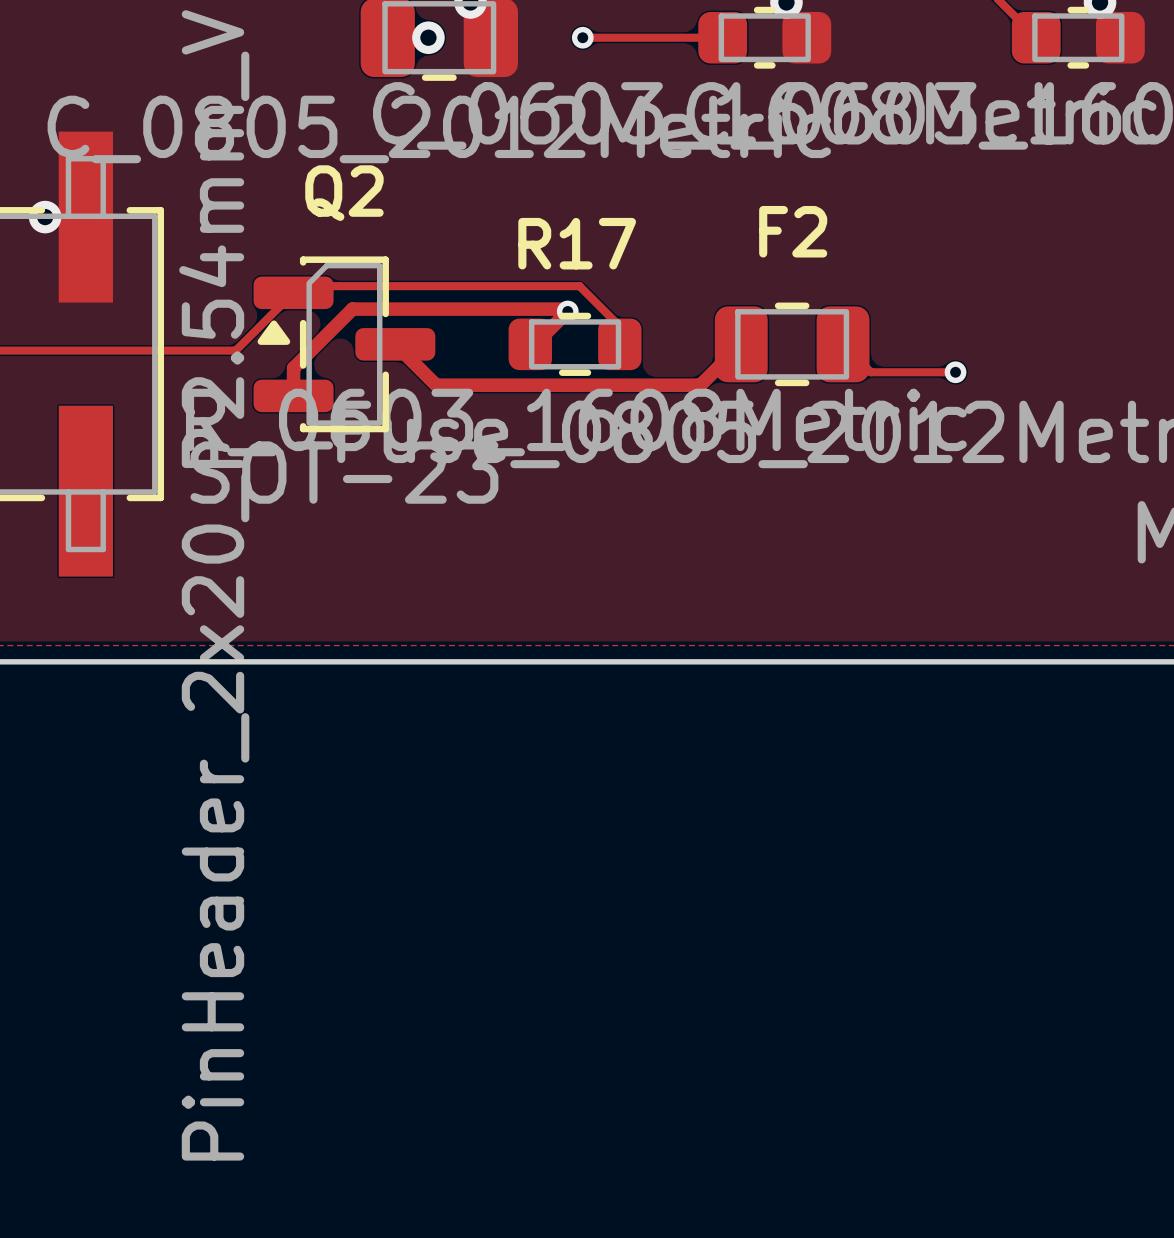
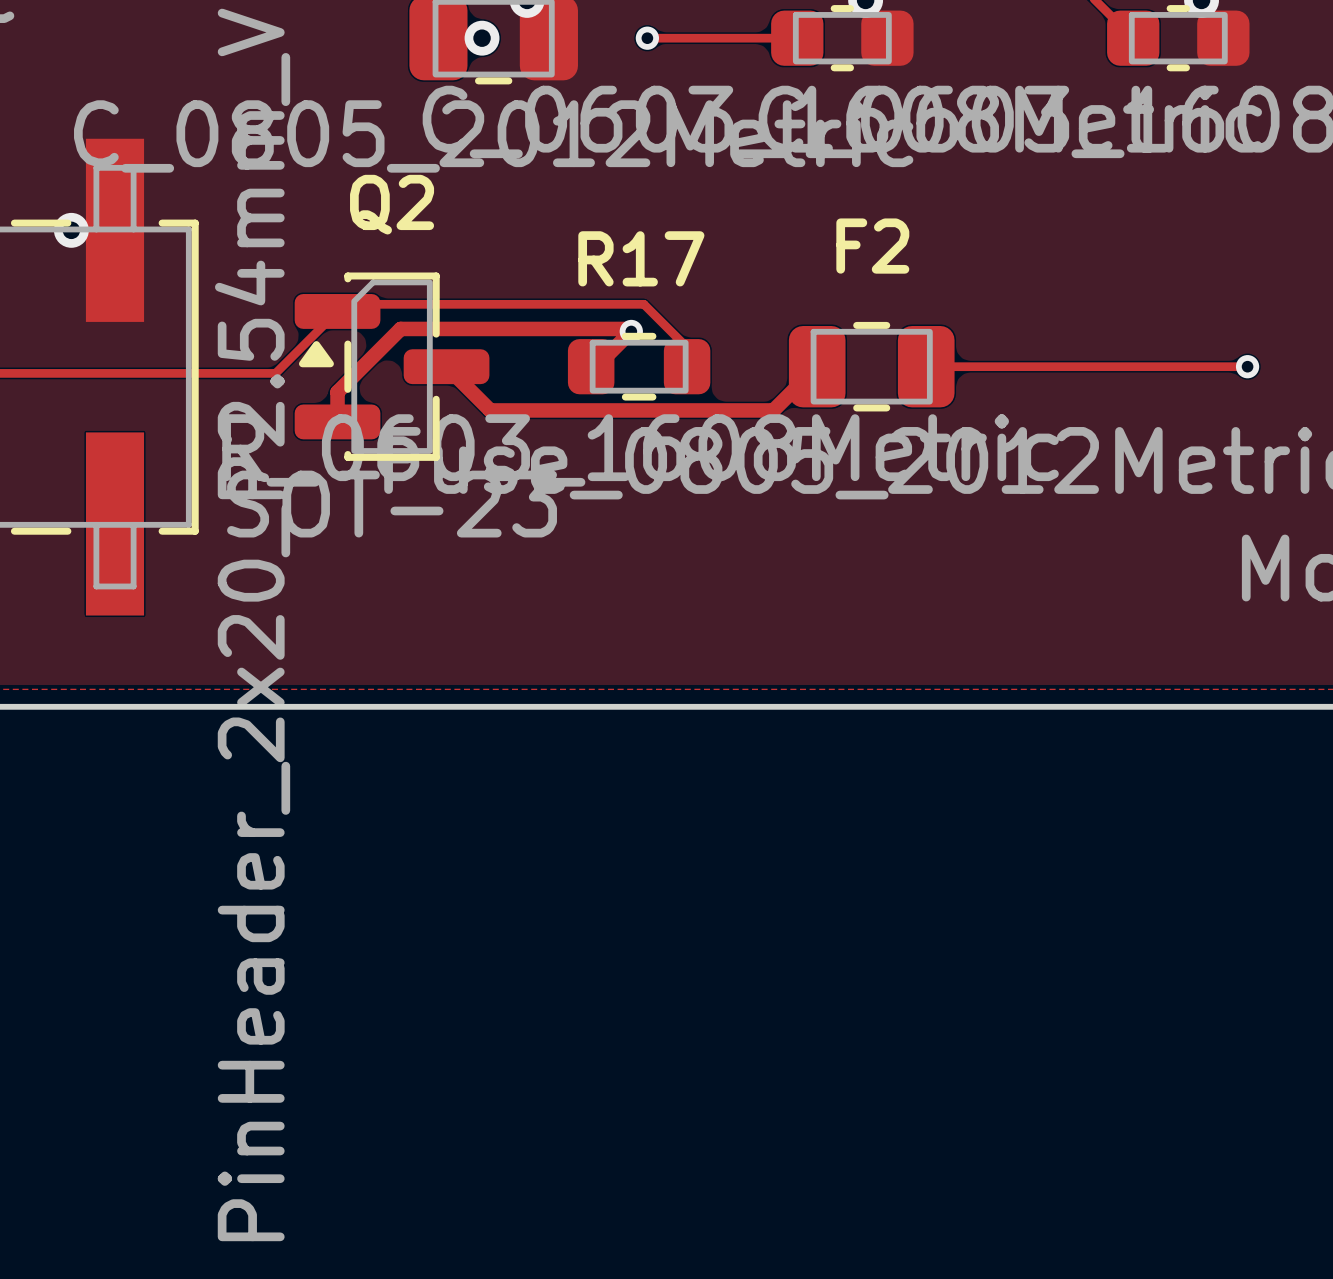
track: (843, 344) (870, 372) (955, 372) -> (926, 366) (1247, 366)
via position: (955, 372) -> (1247, 366)

